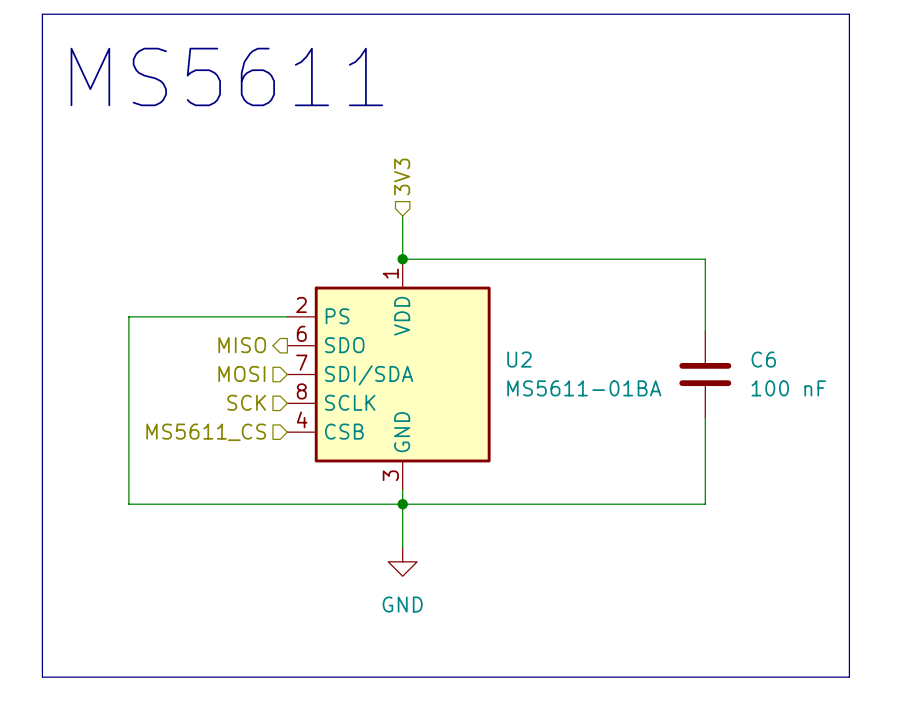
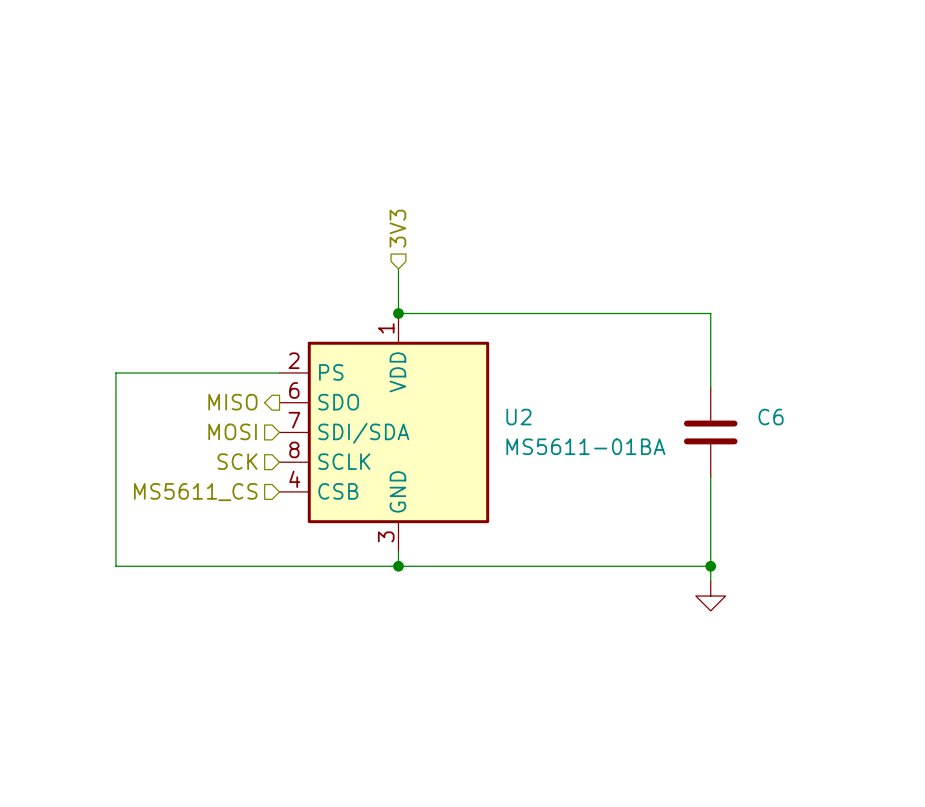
line: (42, 14) (42, 677) (849, 677) (849, 14) (42, 14) -> none
text: MS5611 (226, 76) -> none
C6 value: 100 nF (788, 388) -> none
wire: (402, 504) (402, 547) -> none
wire: none -> (710, 566) (710, 581)
junction: none -> (710, 566)
power symbol: none -> (710, 596)
power symbol: GND (402, 561) -> none

